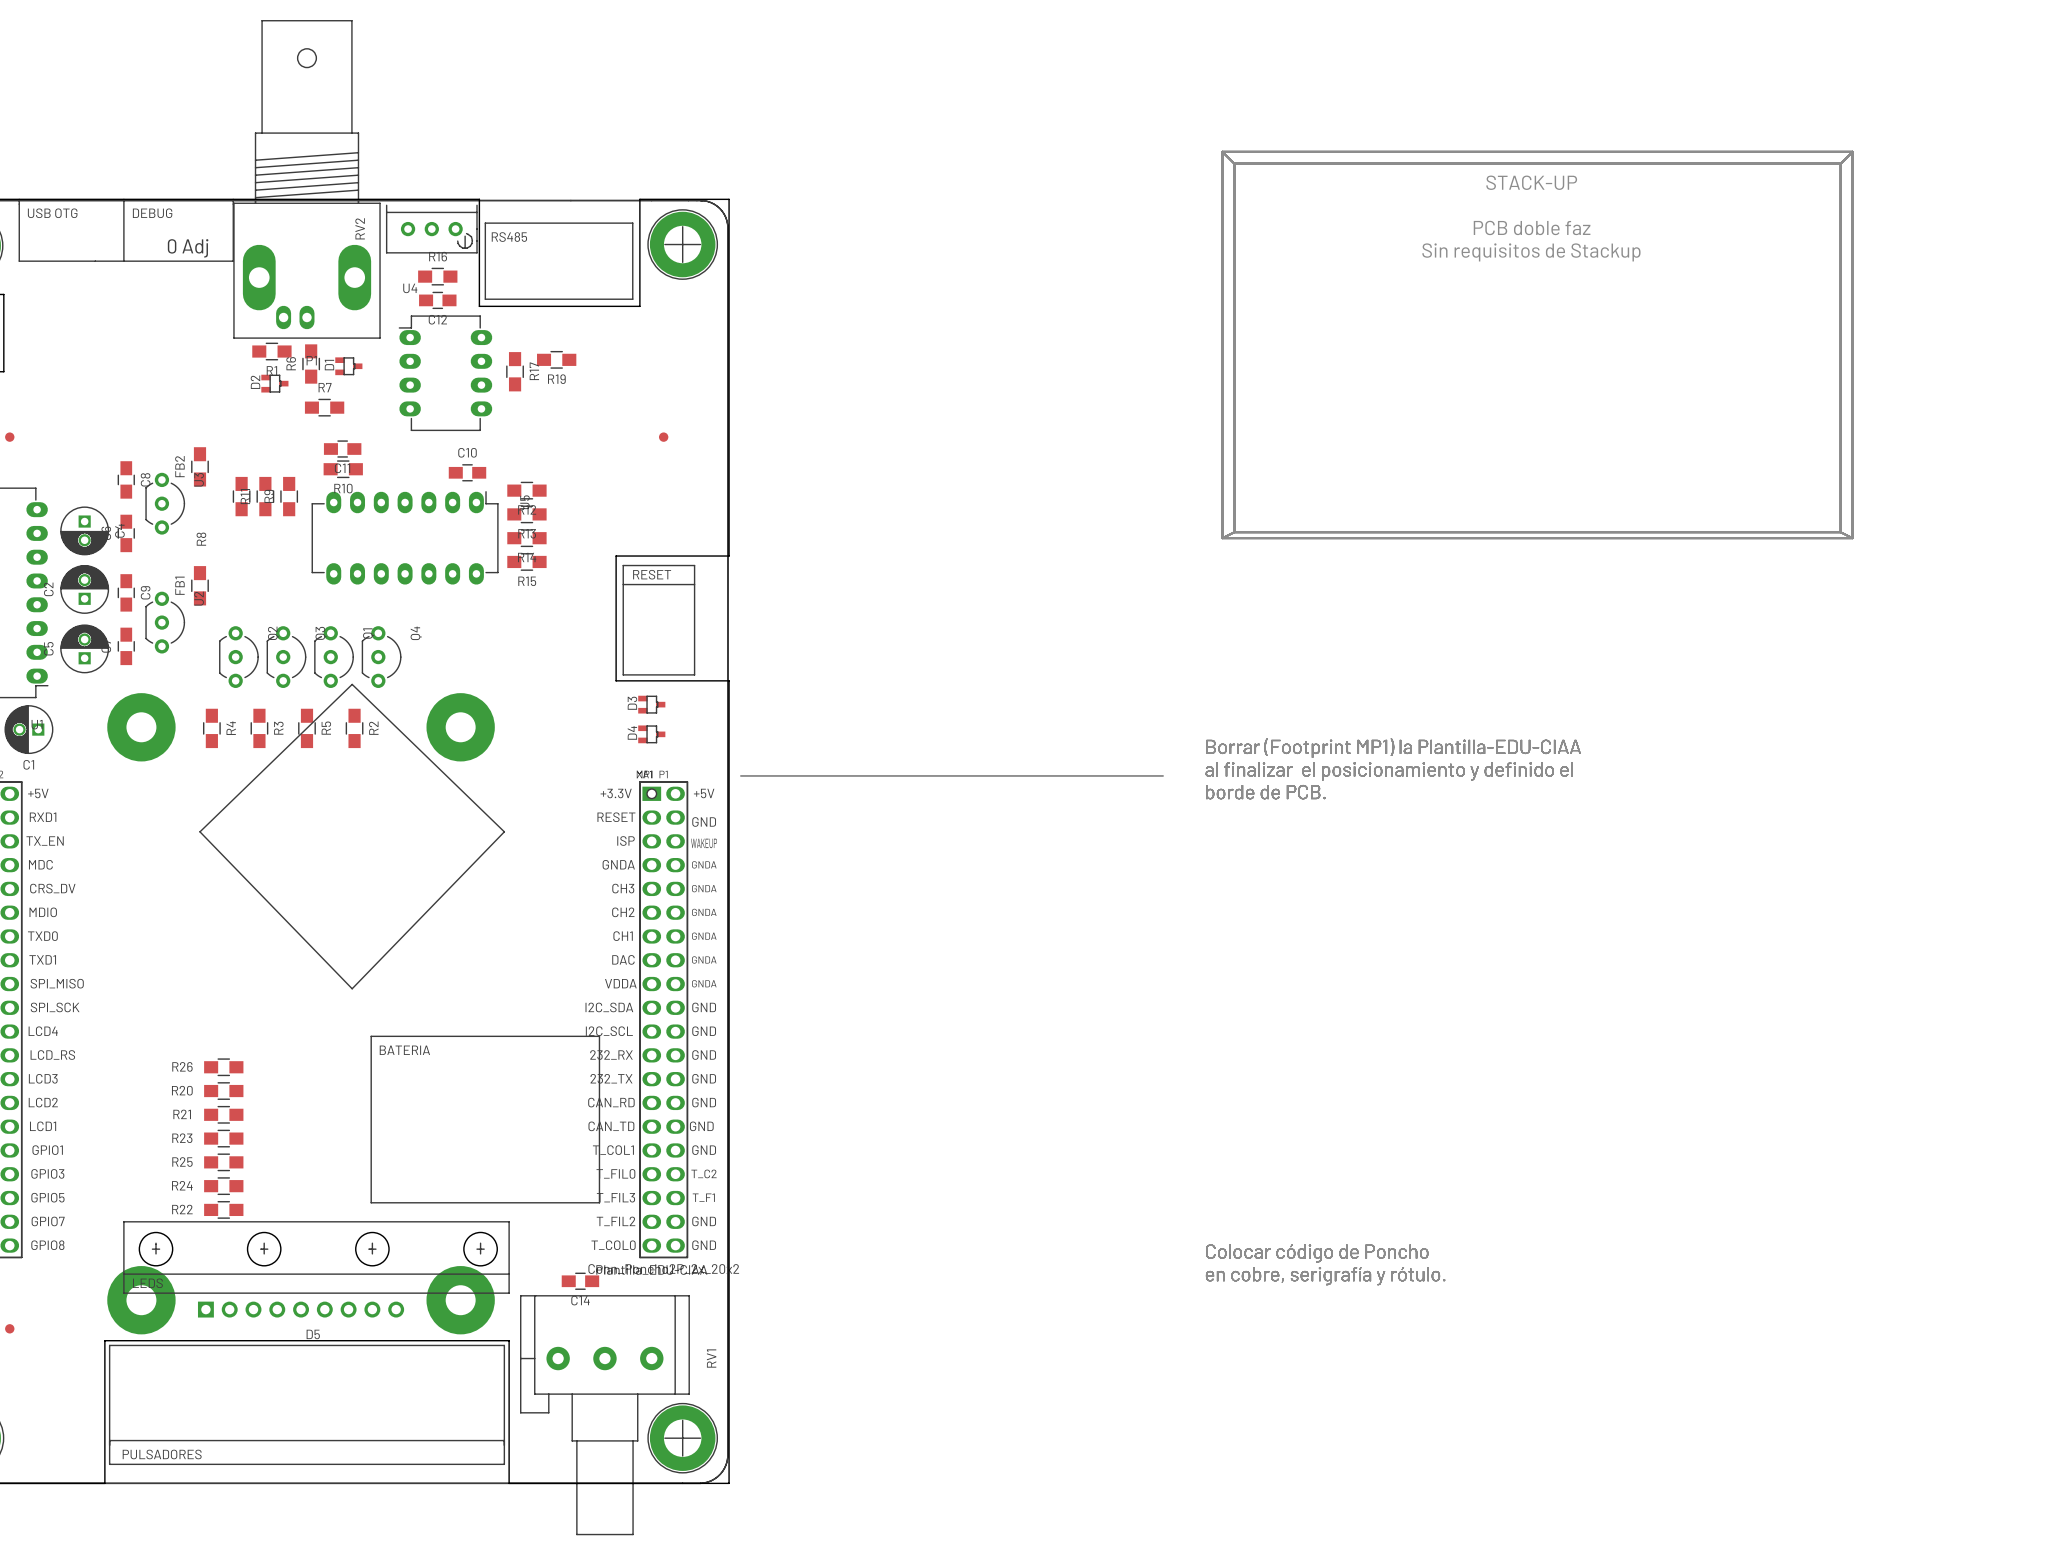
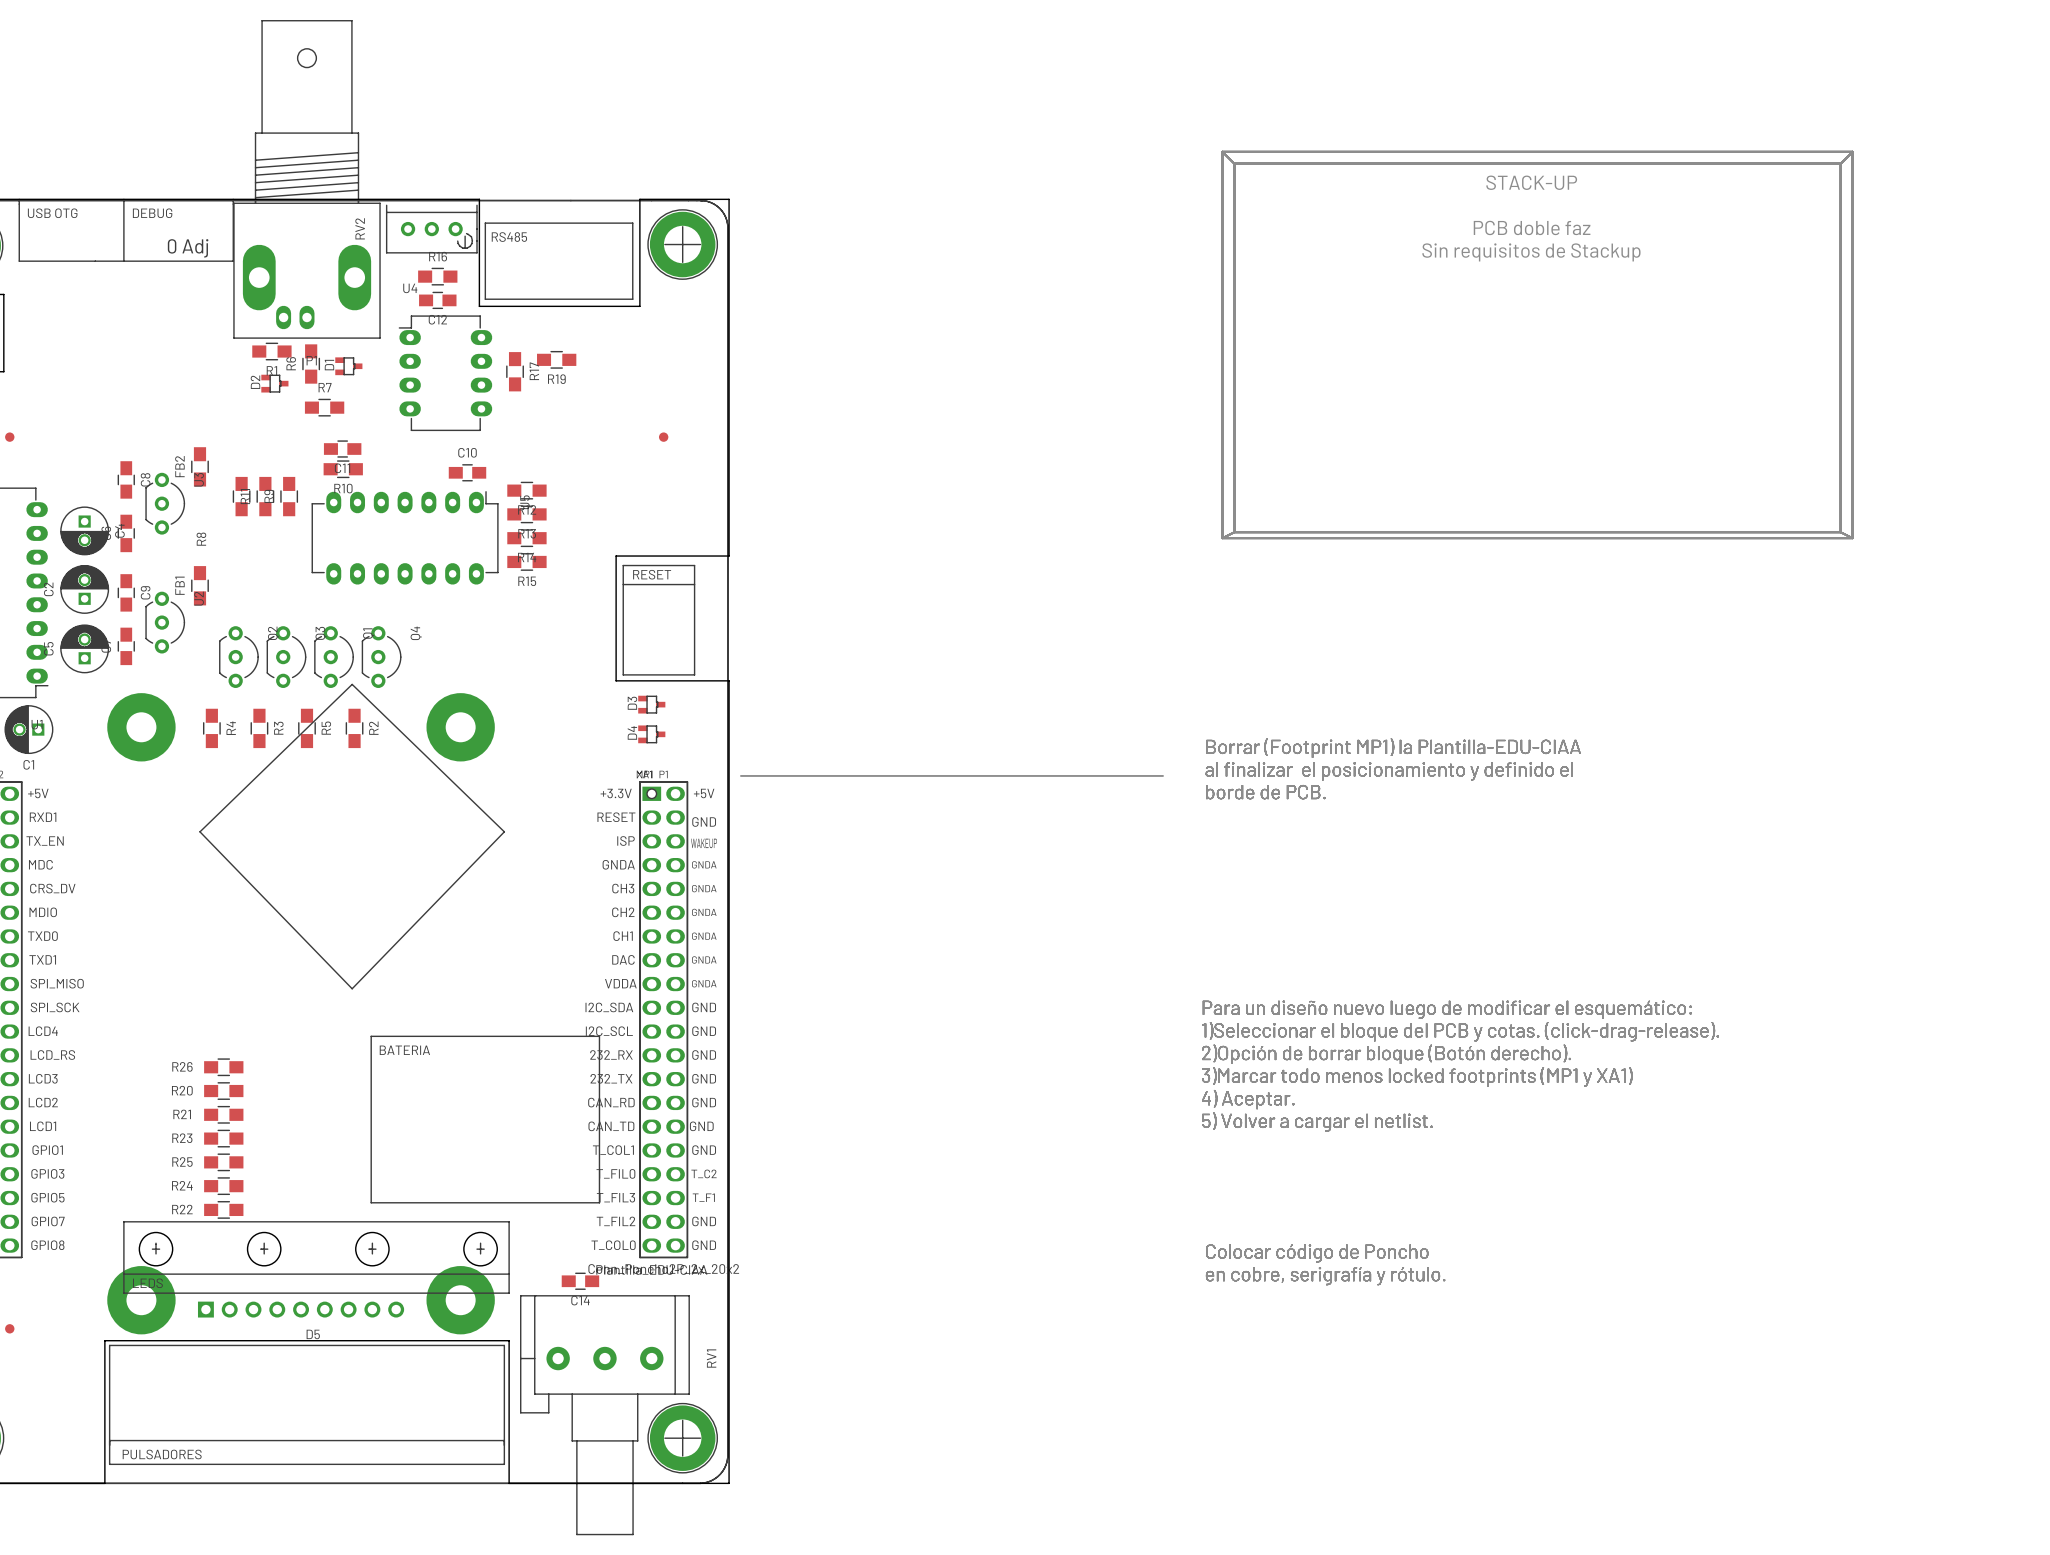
text: none -> Para un diseño nuevo luego de modificar el esquemático: (1447, 1009)
text: none -> 1)Seleccionar el bloque del PCB y cotas. (click-drag-release). (1460, 1031)
text: none -> 2)Opción de borrar bloque (Botón derecho). (1386, 1054)
text: none -> 3)Marcar todo menos locked footprints (MP1 y XA1) (1417, 1077)
text: none -> 4) Aceptar. (1248, 1099)
text: none -> 5) Volver a cargar el netlist. (1317, 1122)

